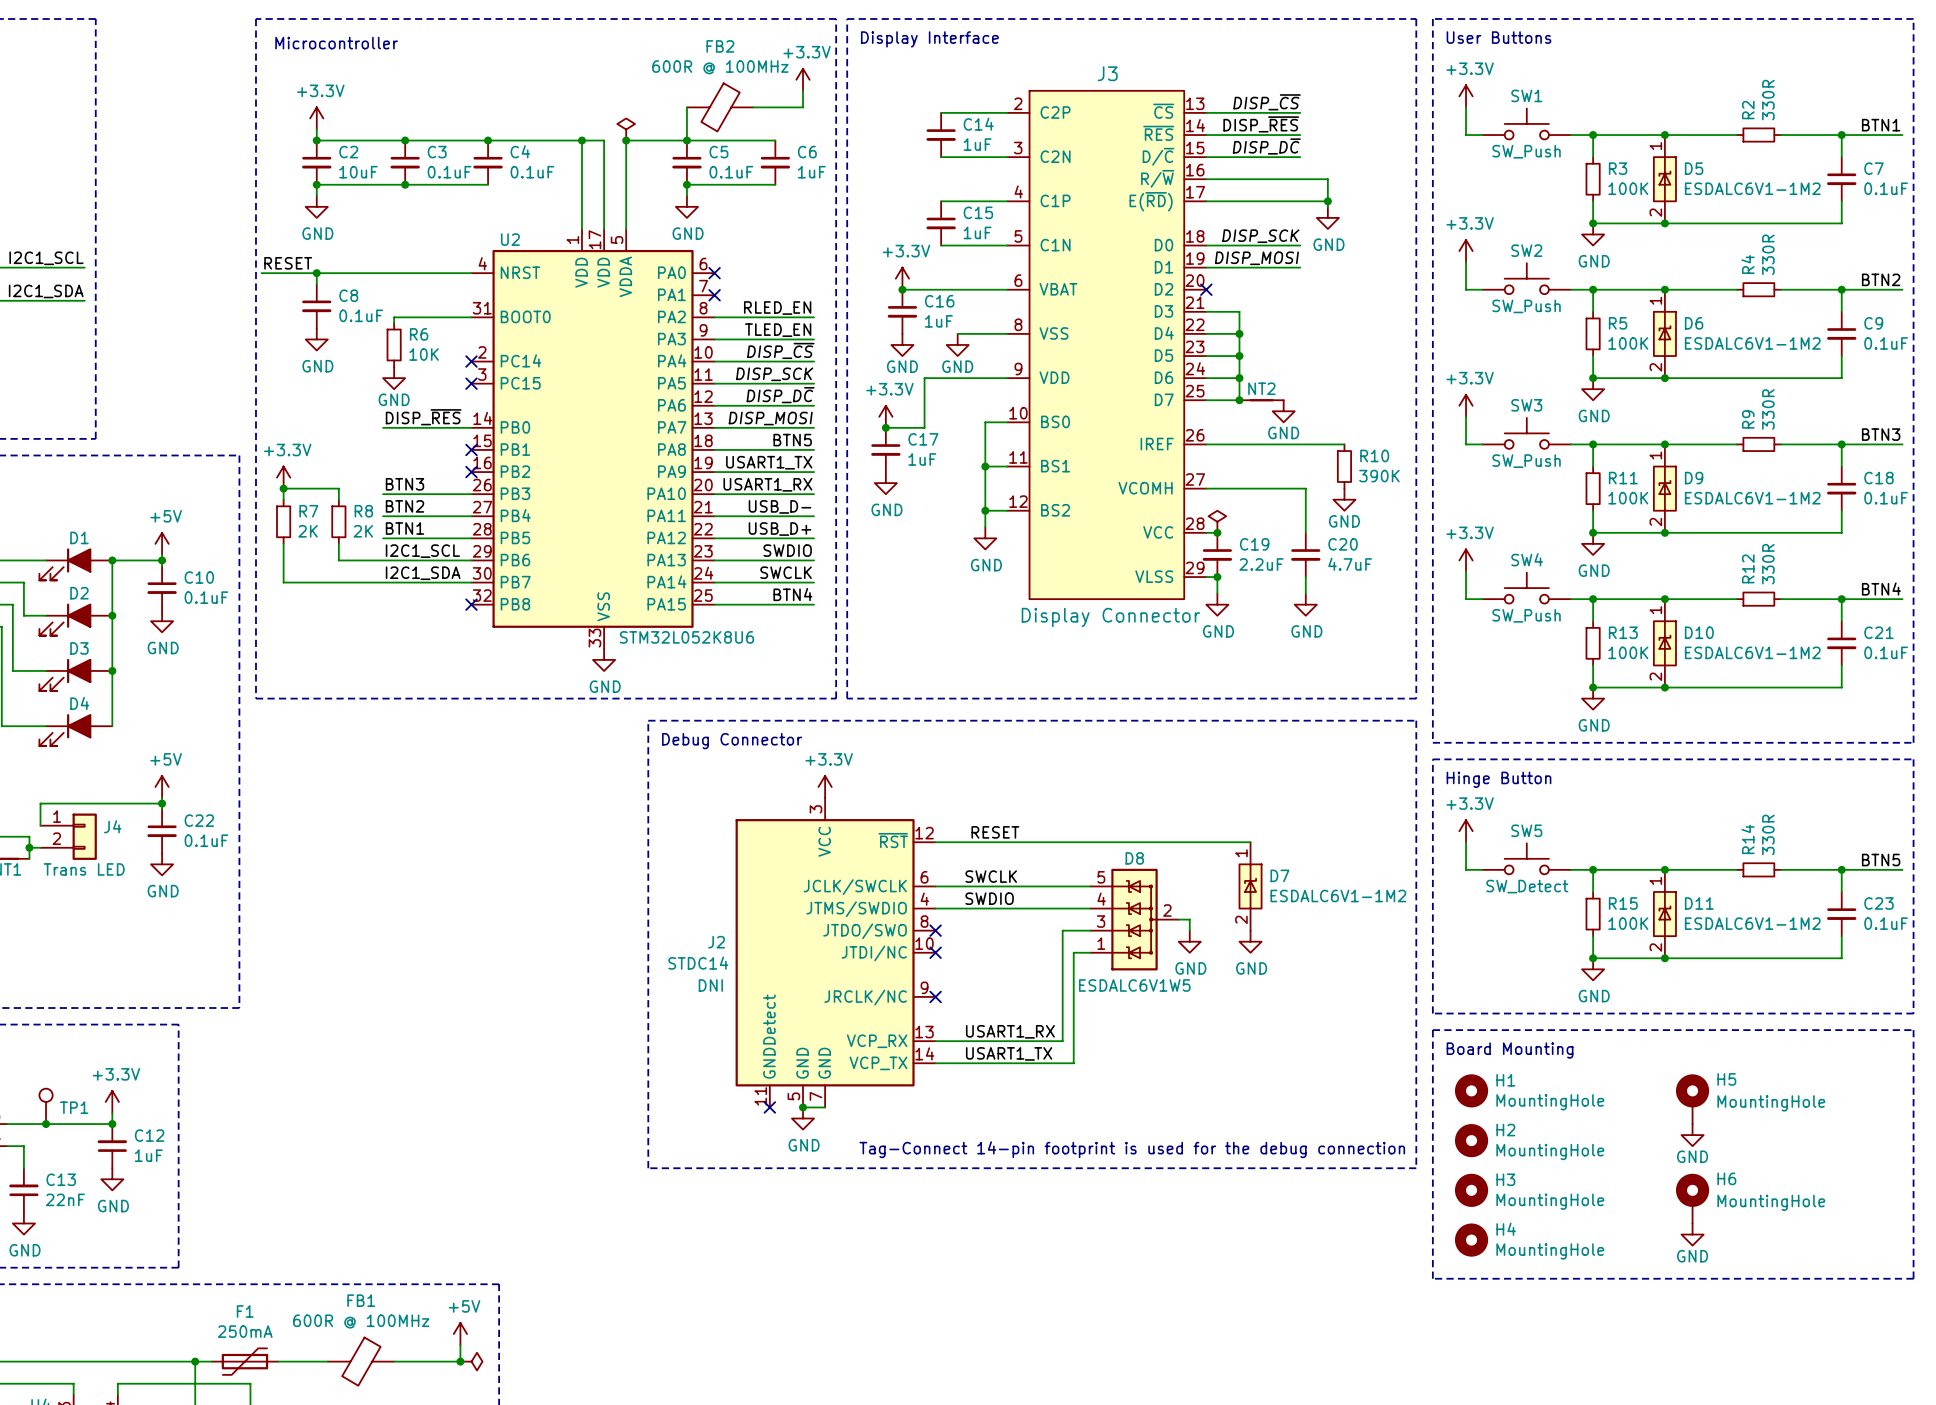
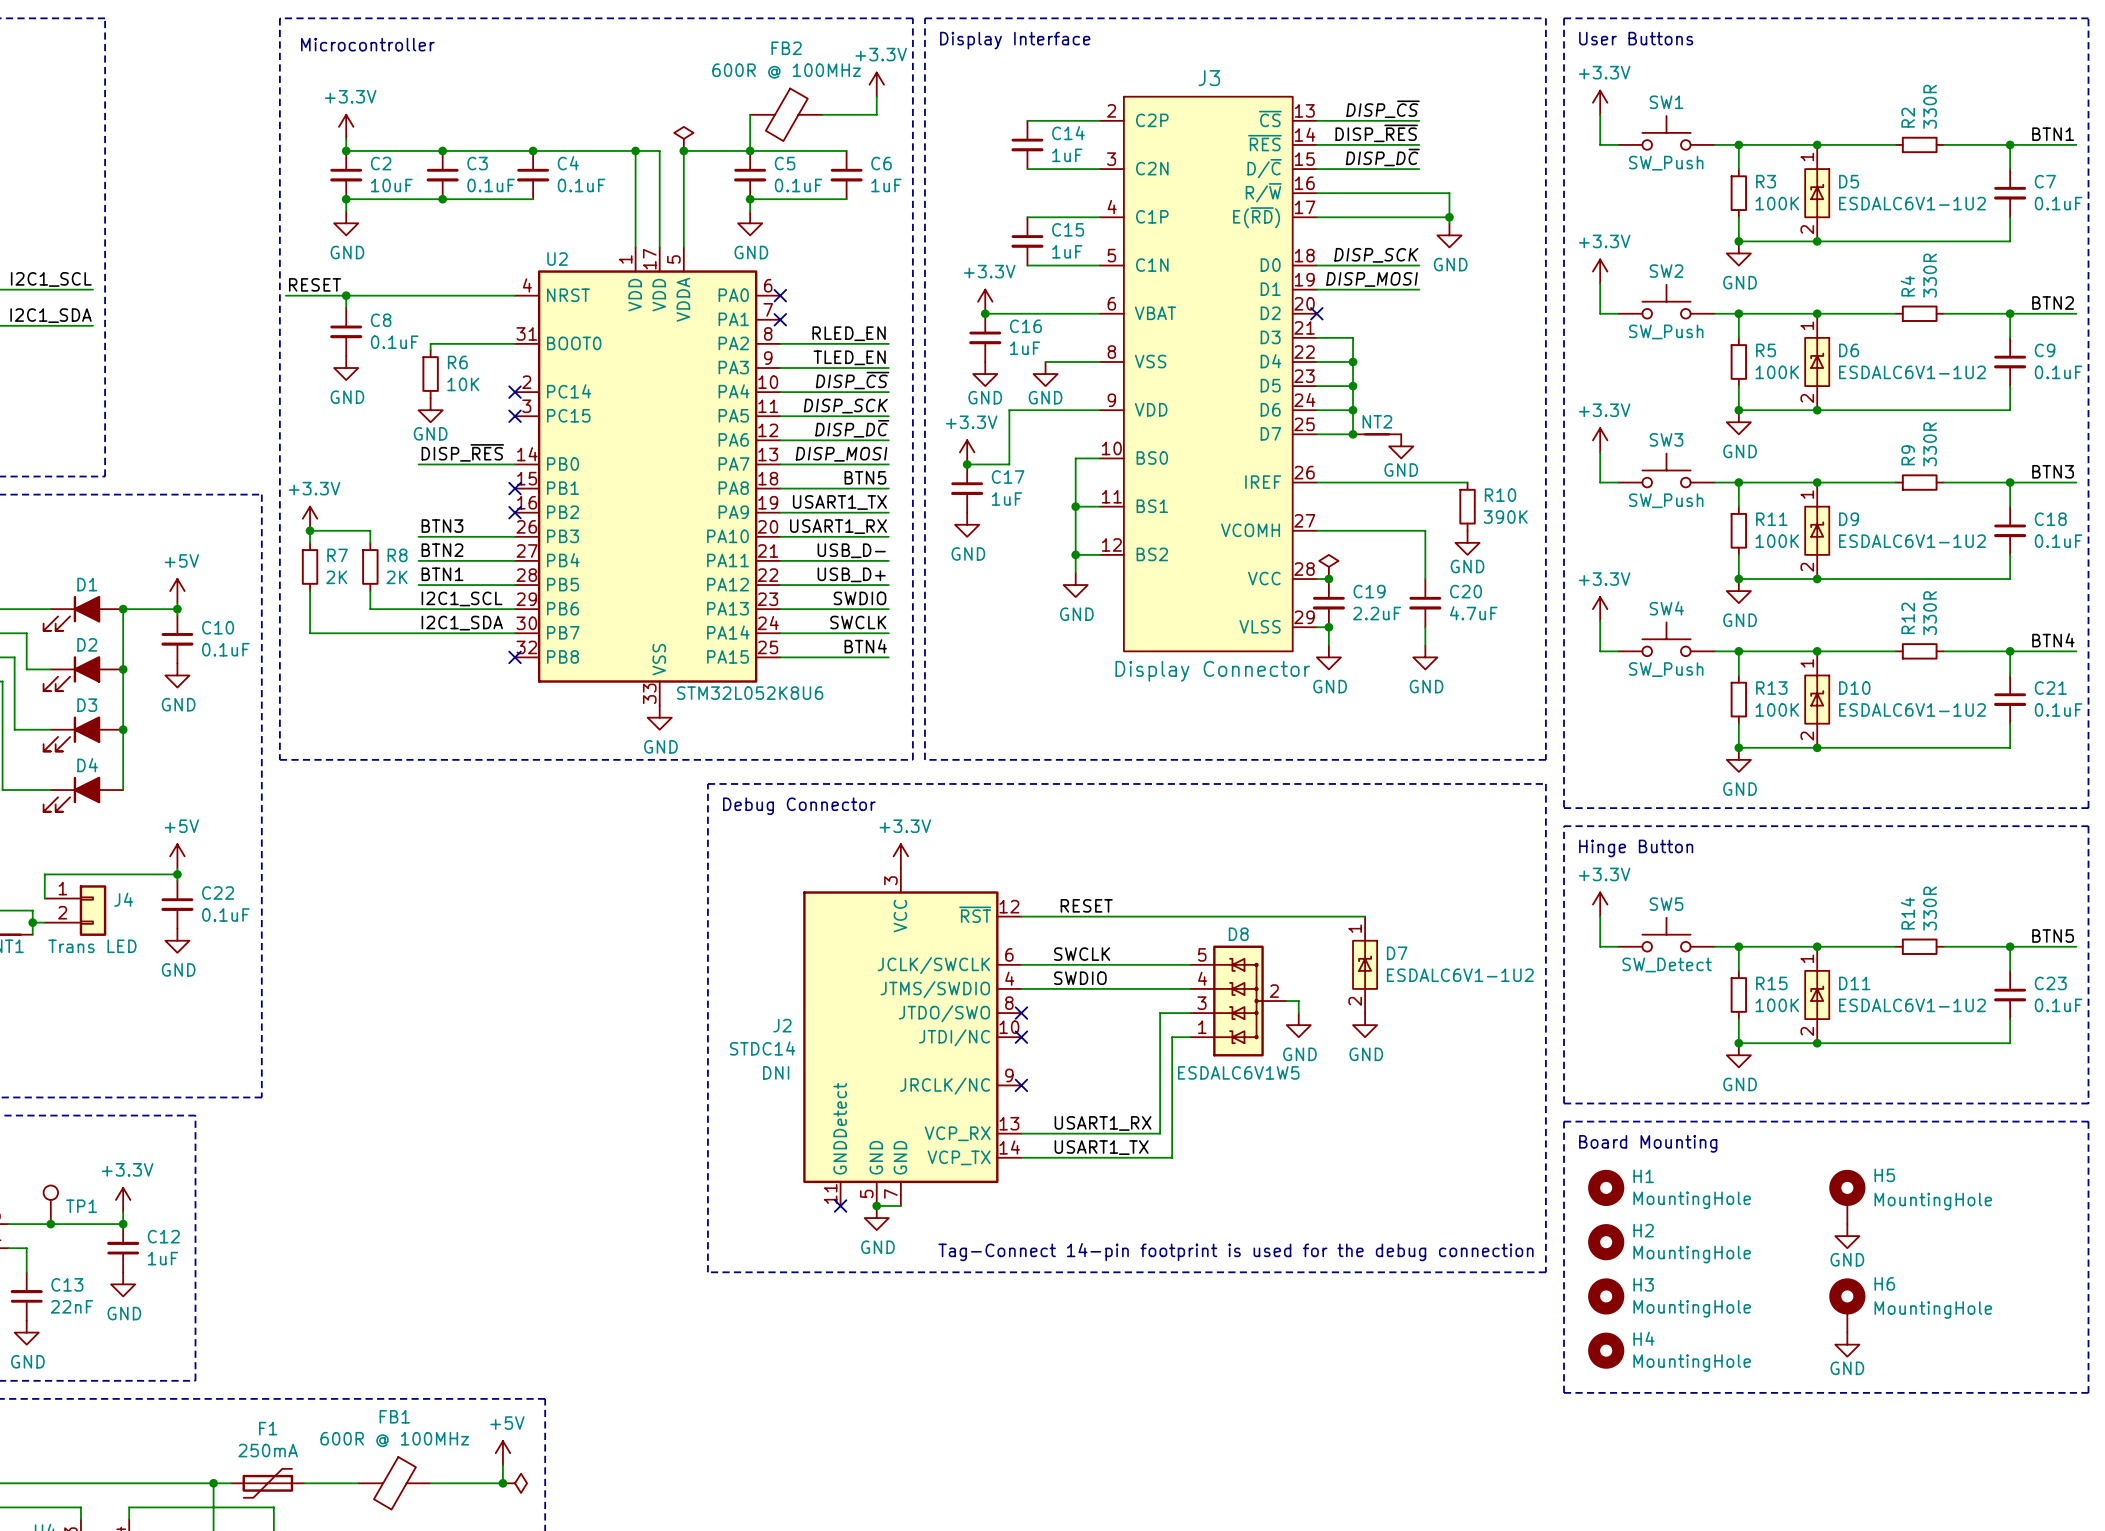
D5 value: ESDALC6V1-1M2 (1752, 188) -> ESDALC6V1-1U2 (1912, 203)
D6 value: ESDALC6V1-1M2 (1752, 343) -> ESDALC6V1-1U2 (1912, 372)
D9 value: ESDALC6V1-1M2 (1752, 498) -> ESDALC6V1-1U2 (1912, 541)
D10 value: ESDALC6V1-1M2 (1752, 652) -> ESDALC6V1-1U2 (1912, 709)
D7 value: ESDALC6V1-1M2 (1338, 895) -> ESDALC6V1-1U2 (1460, 975)
D11 value: ESDALC6V1-1M2 (1752, 923) -> ESDALC6V1-1U2 (1912, 1005)

